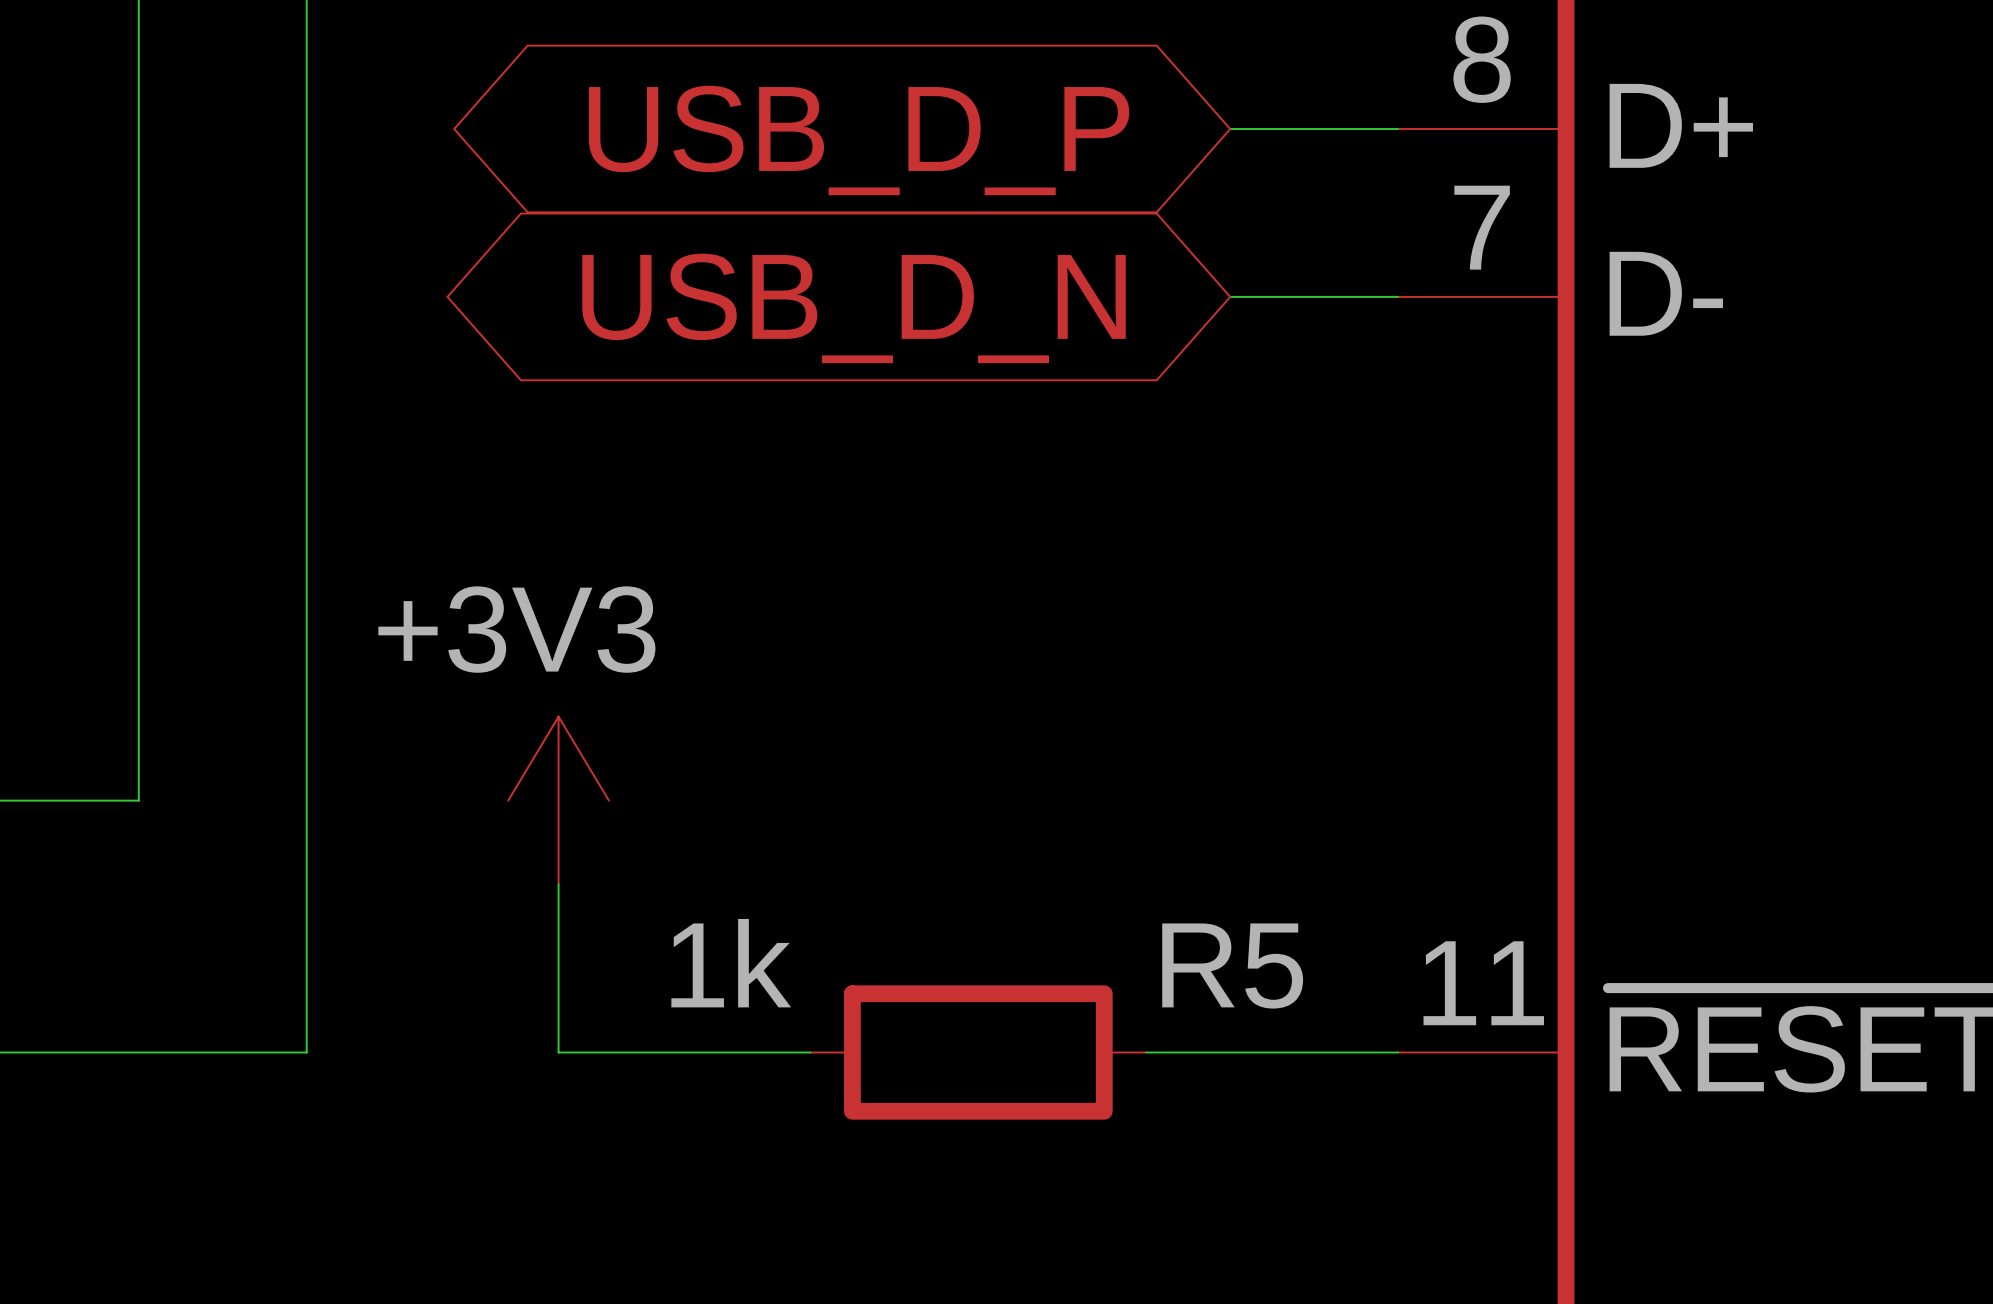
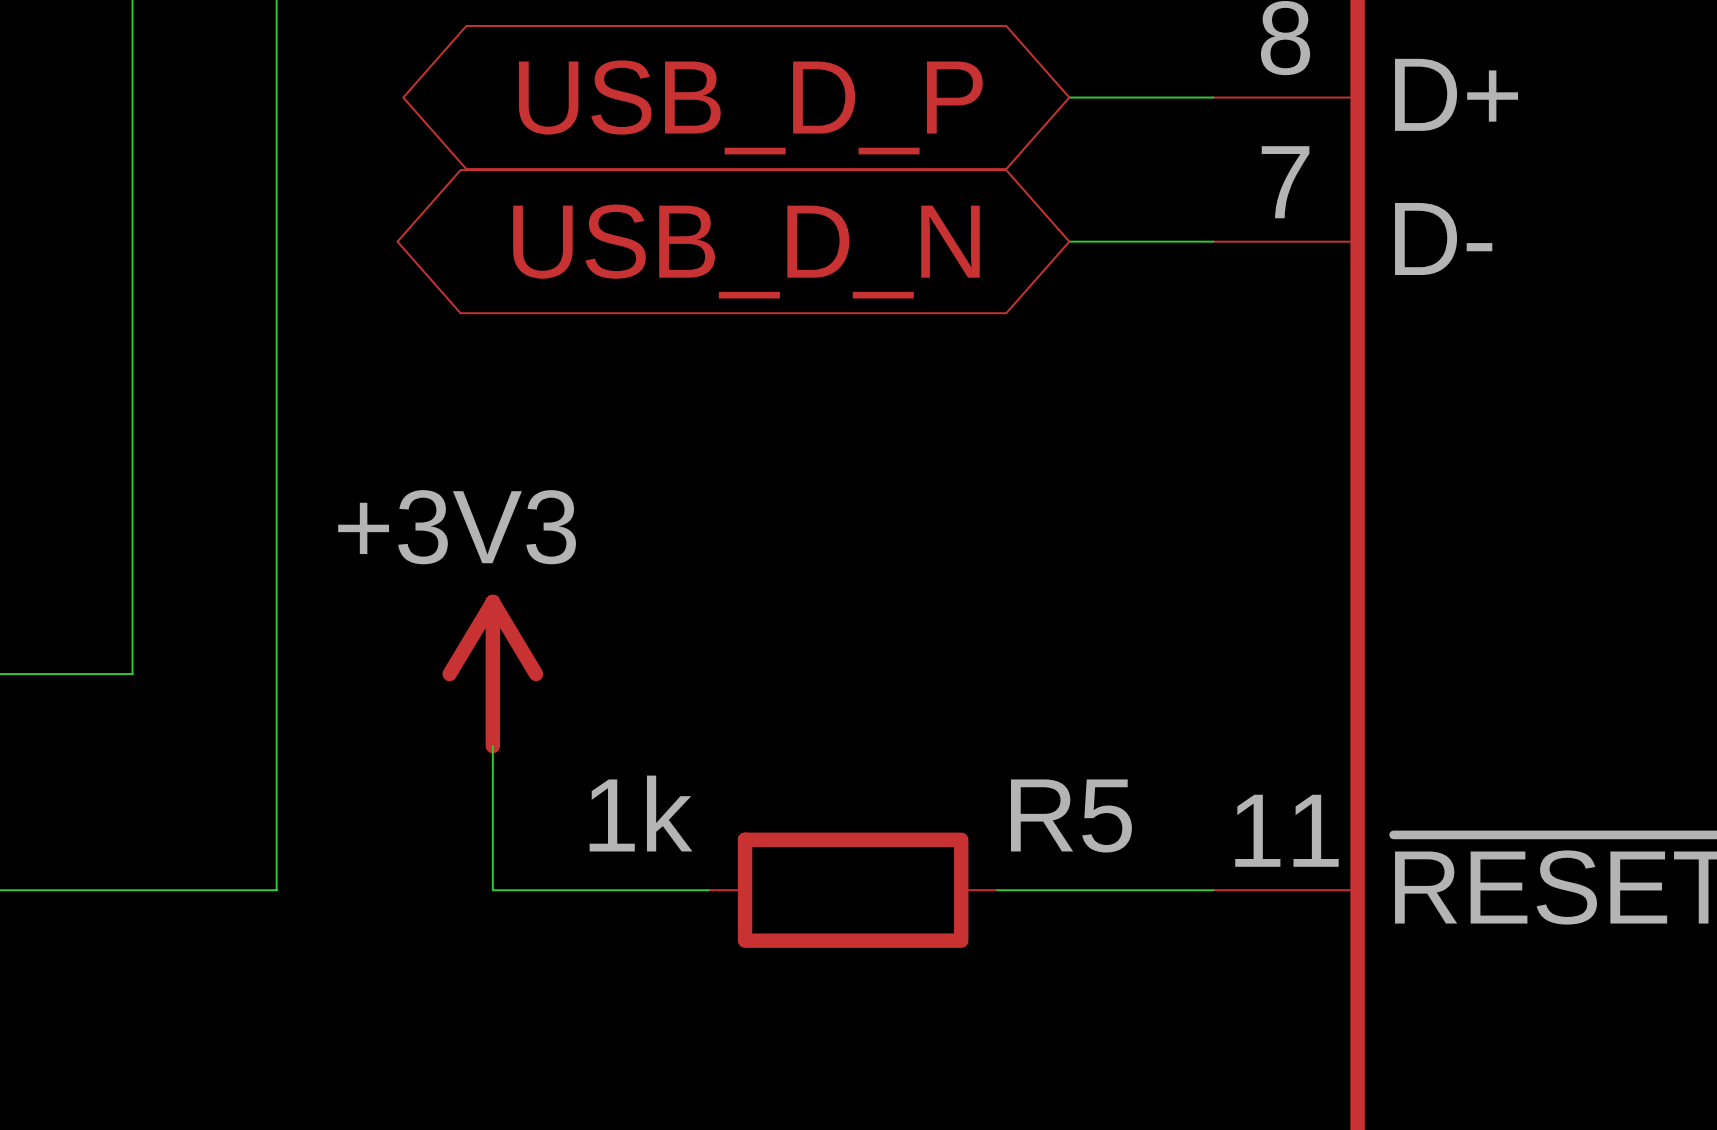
power symbol shape: [508, 716, 609, 885] -> [442, 594, 544, 754]

